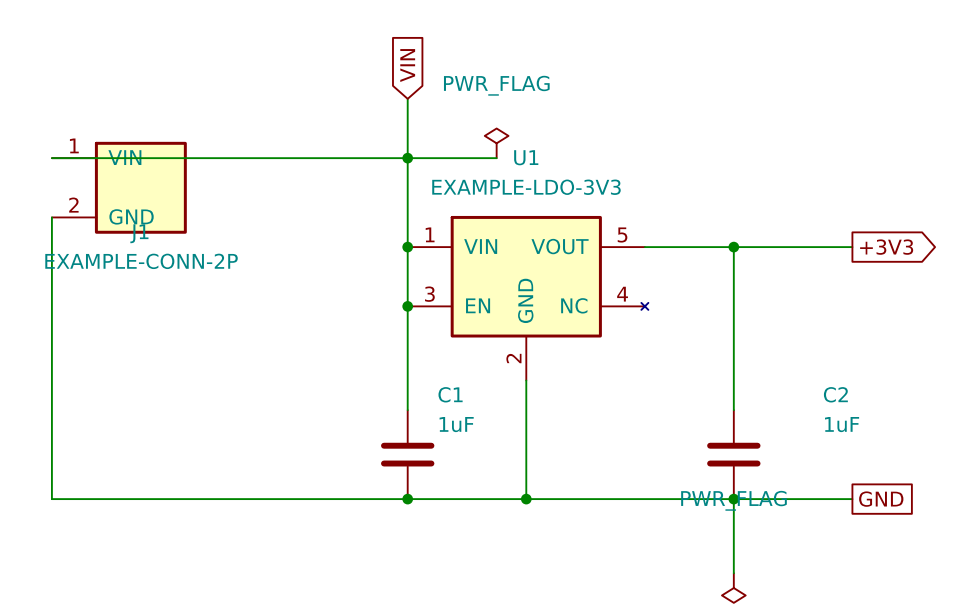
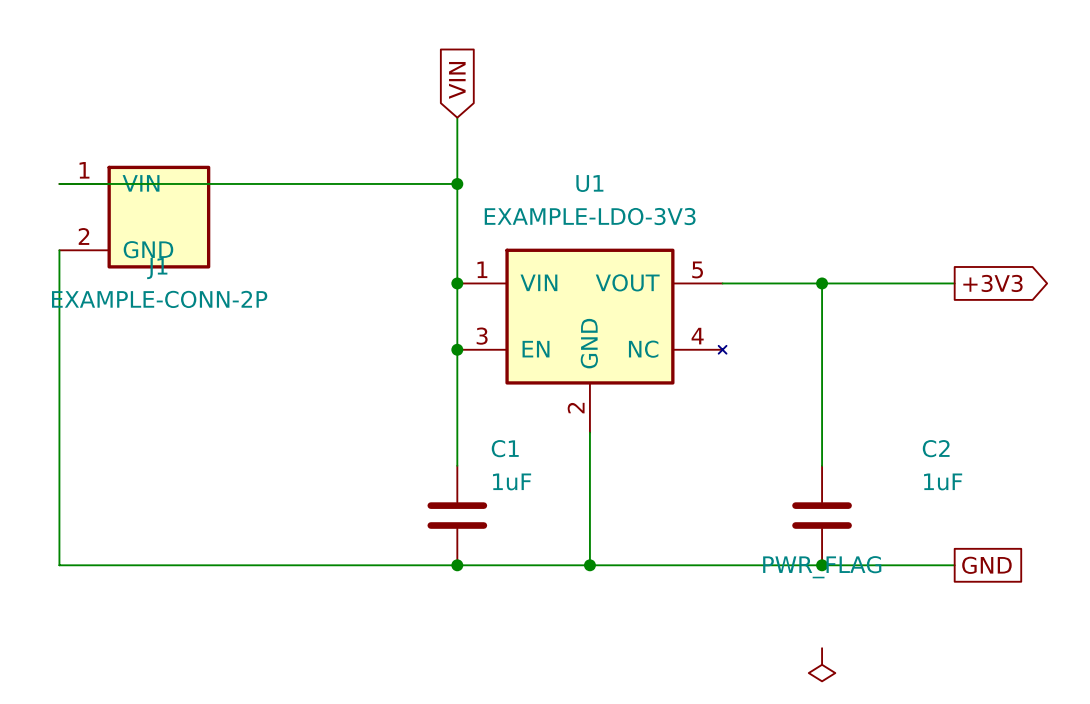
power symbol: PWR_FLAG (496, 143) -> none
wire: (407, 158) (496, 158) -> none
wire: (733, 499) (733, 573) -> none

